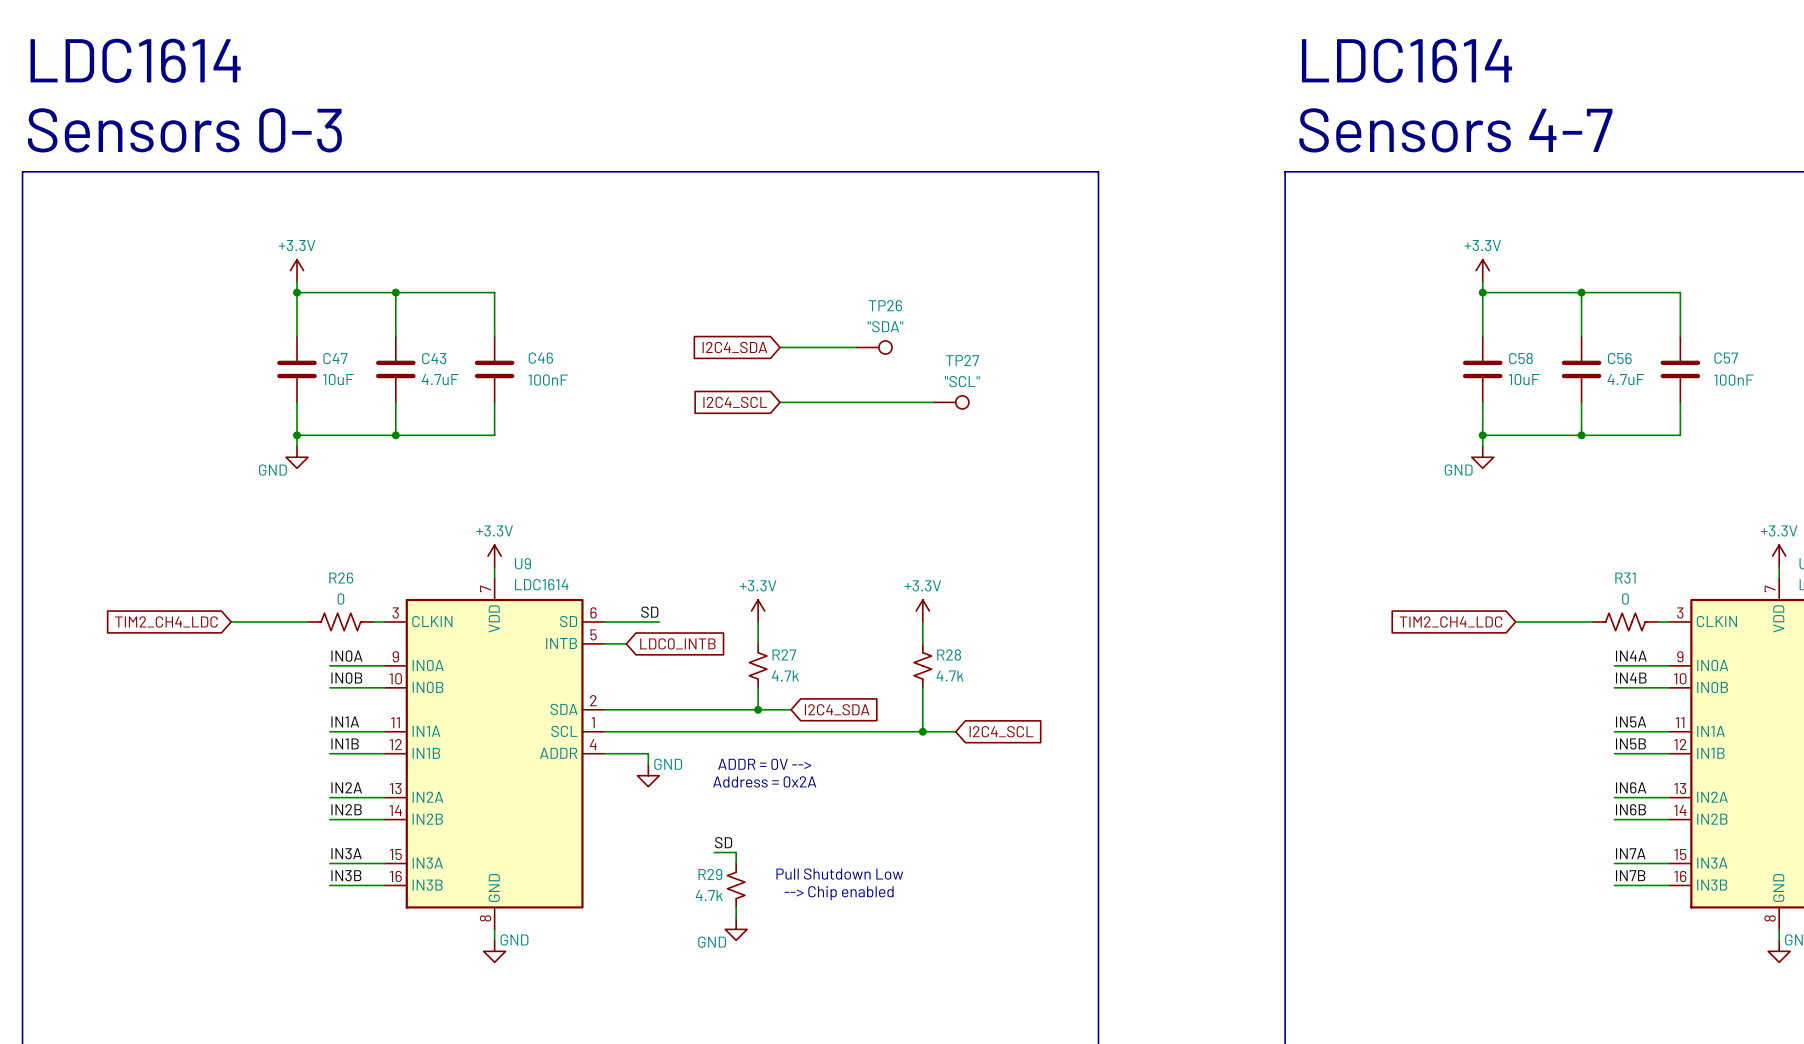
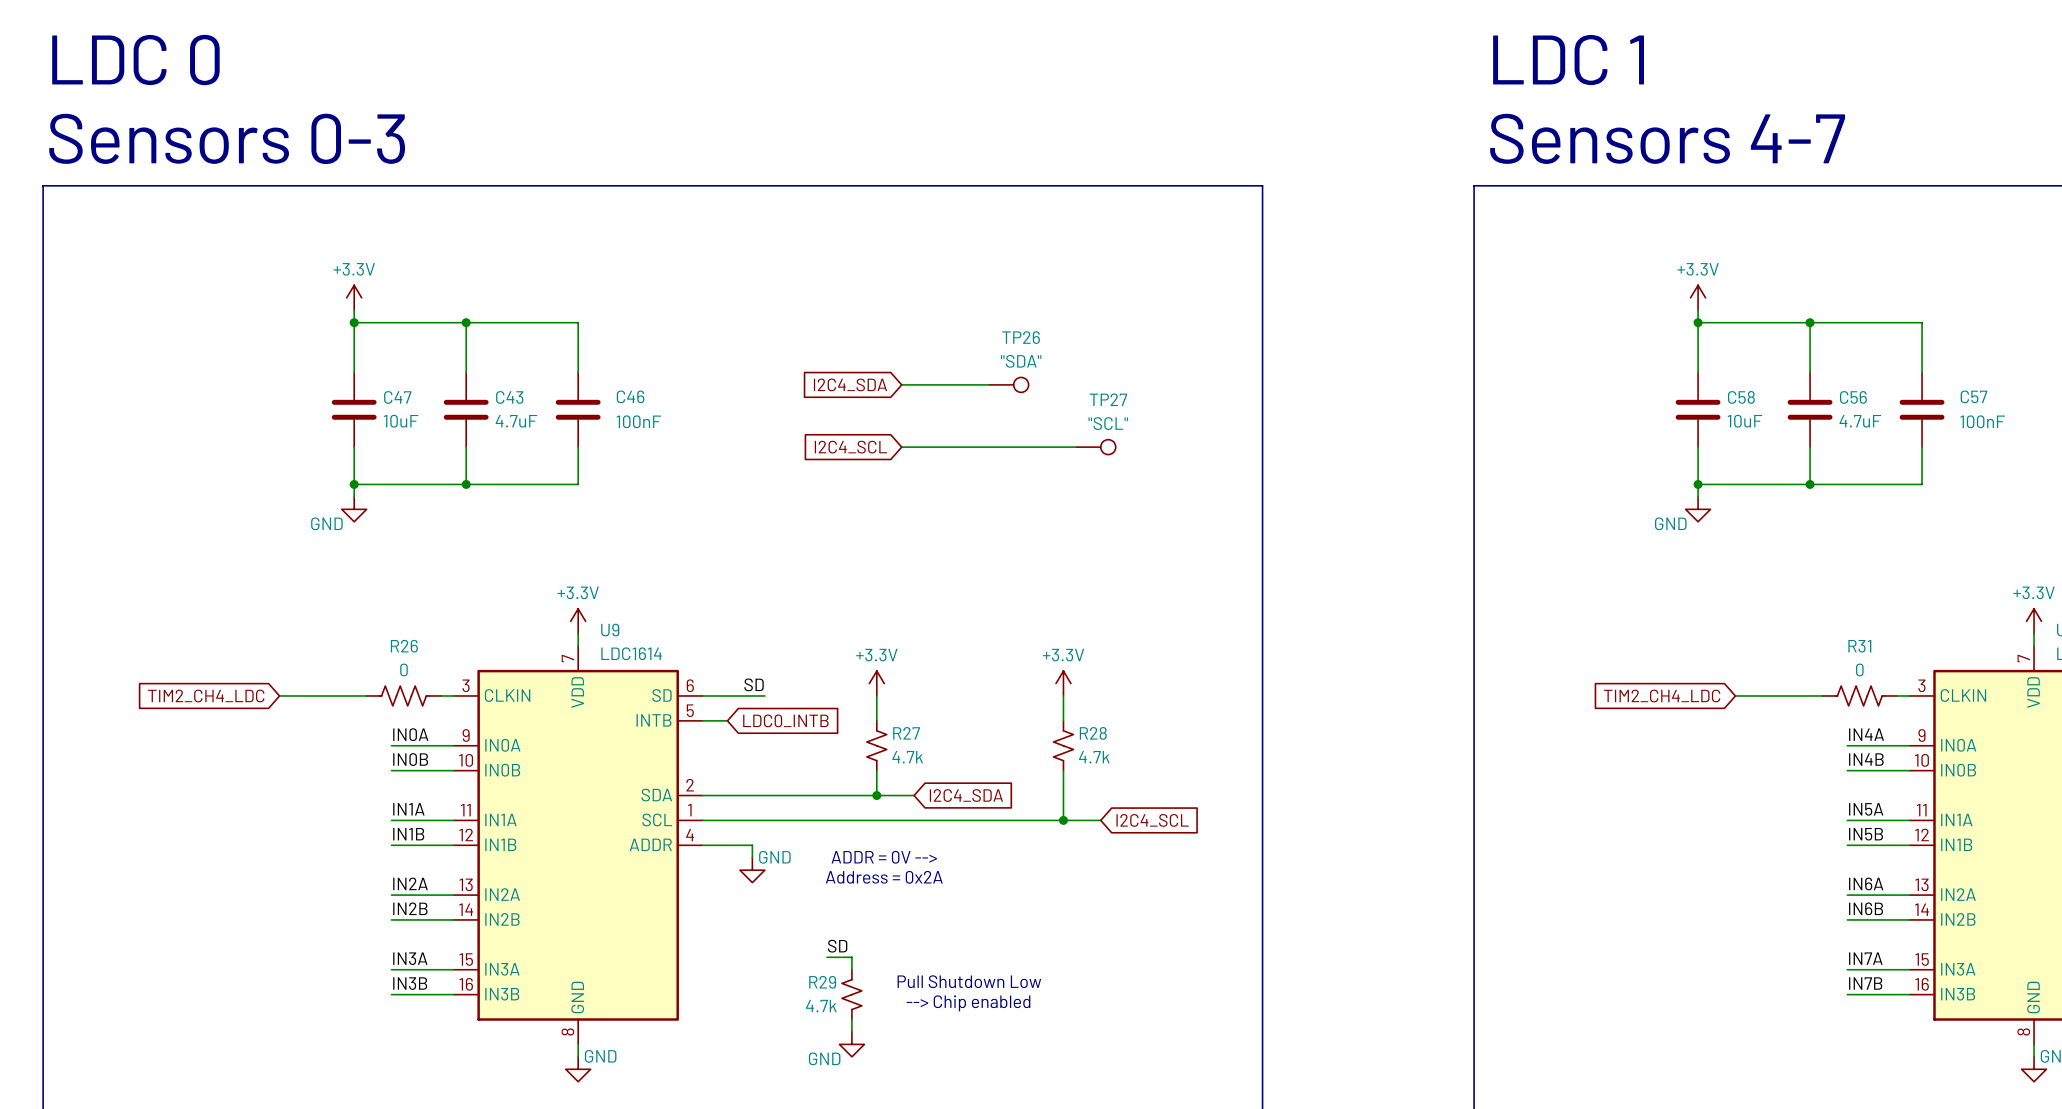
text: LDC1614 (135, 60) -> LDC 0 (135, 60)
text: LDC1614 (1407, 60) -> LDC 1 (1568, 60)

